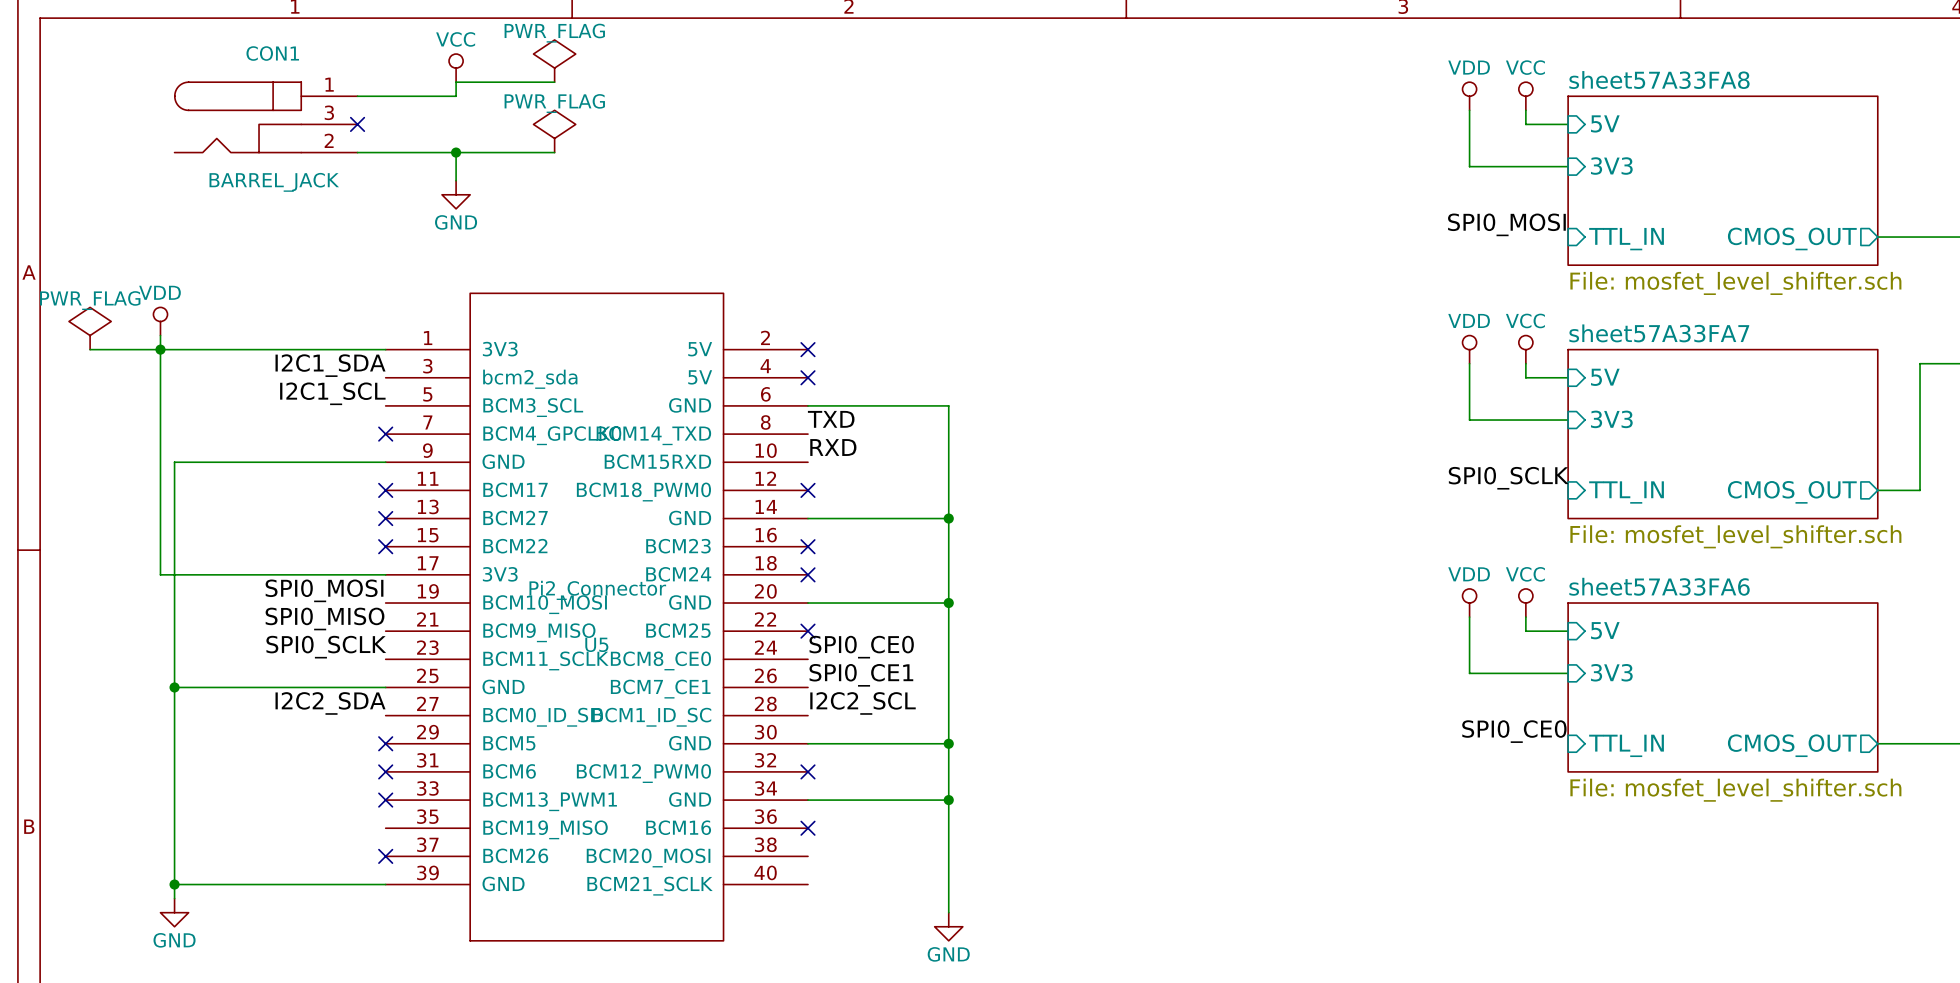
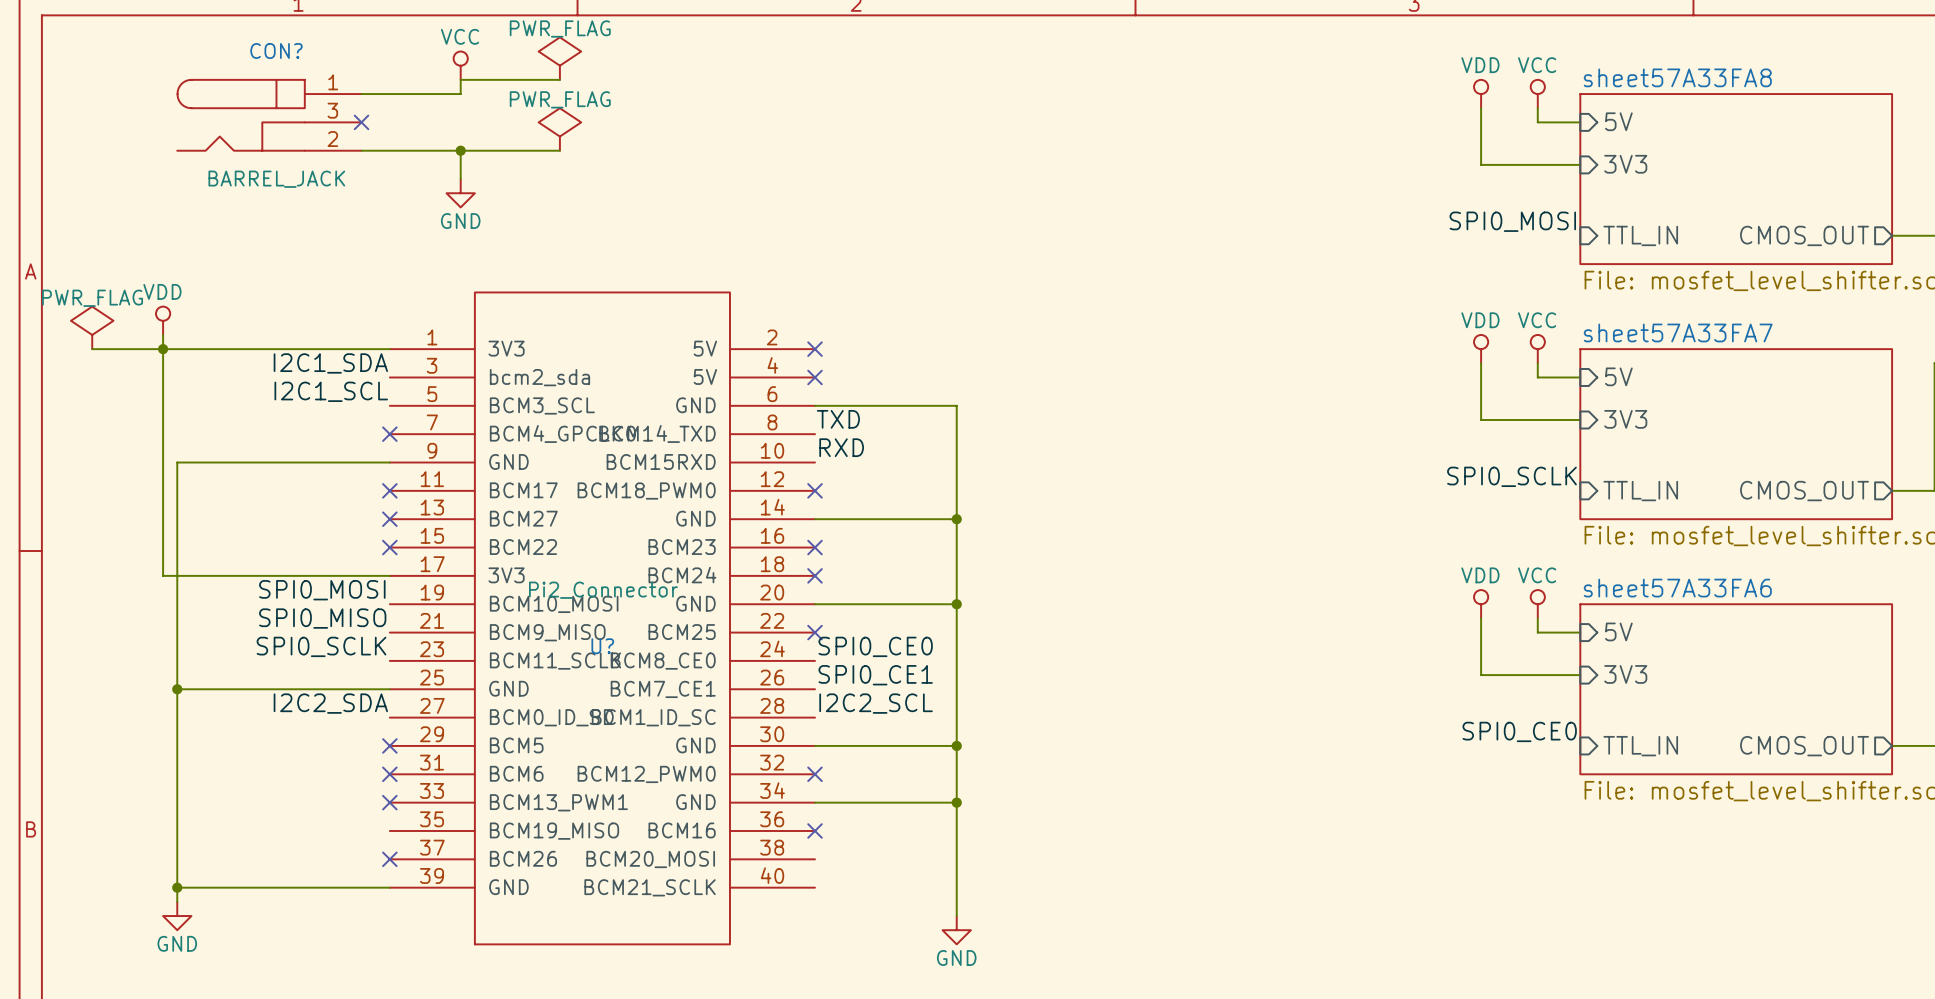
CON1 name: CON1 (272, 53) -> CON? (276, 50)
U5 name: U5 (596, 644) -> U? (602, 646)

